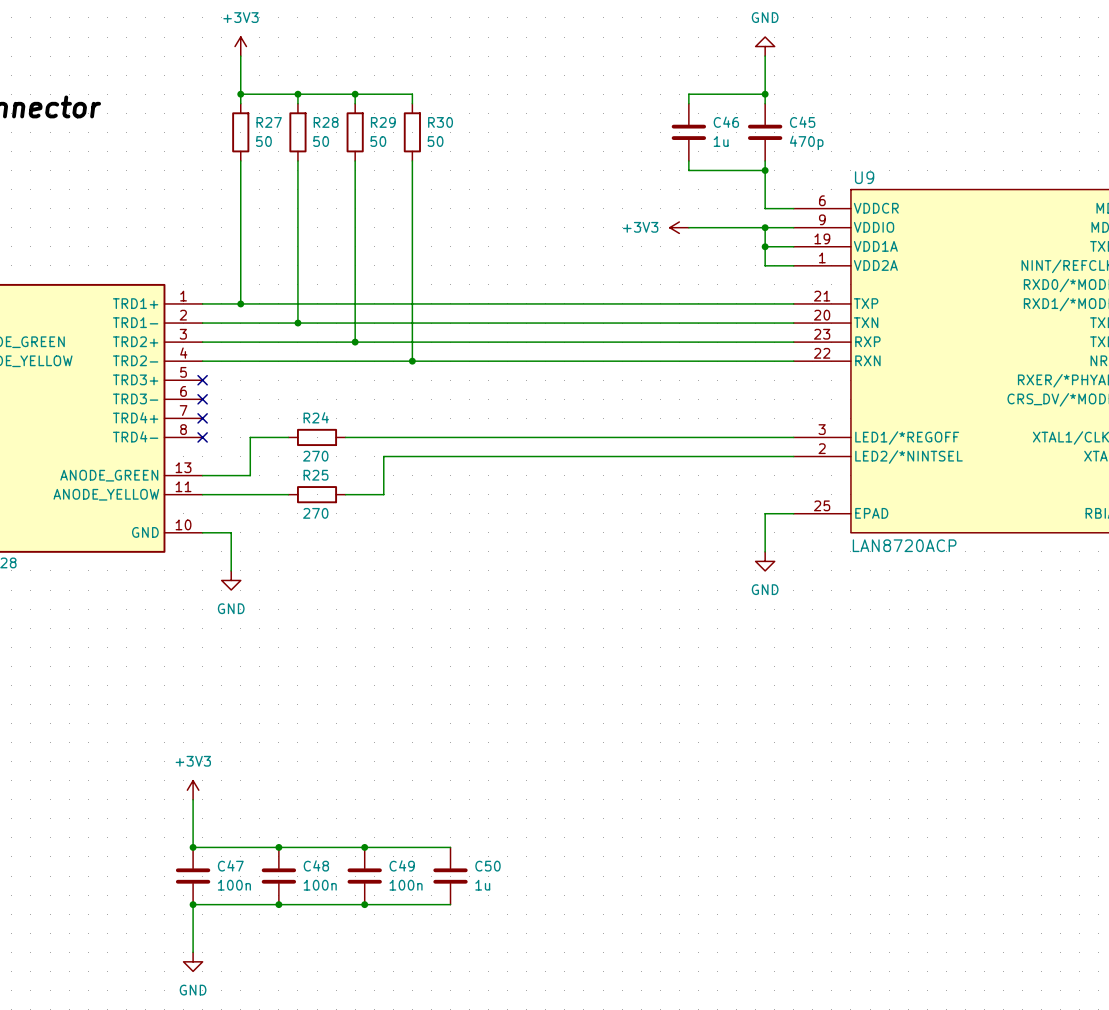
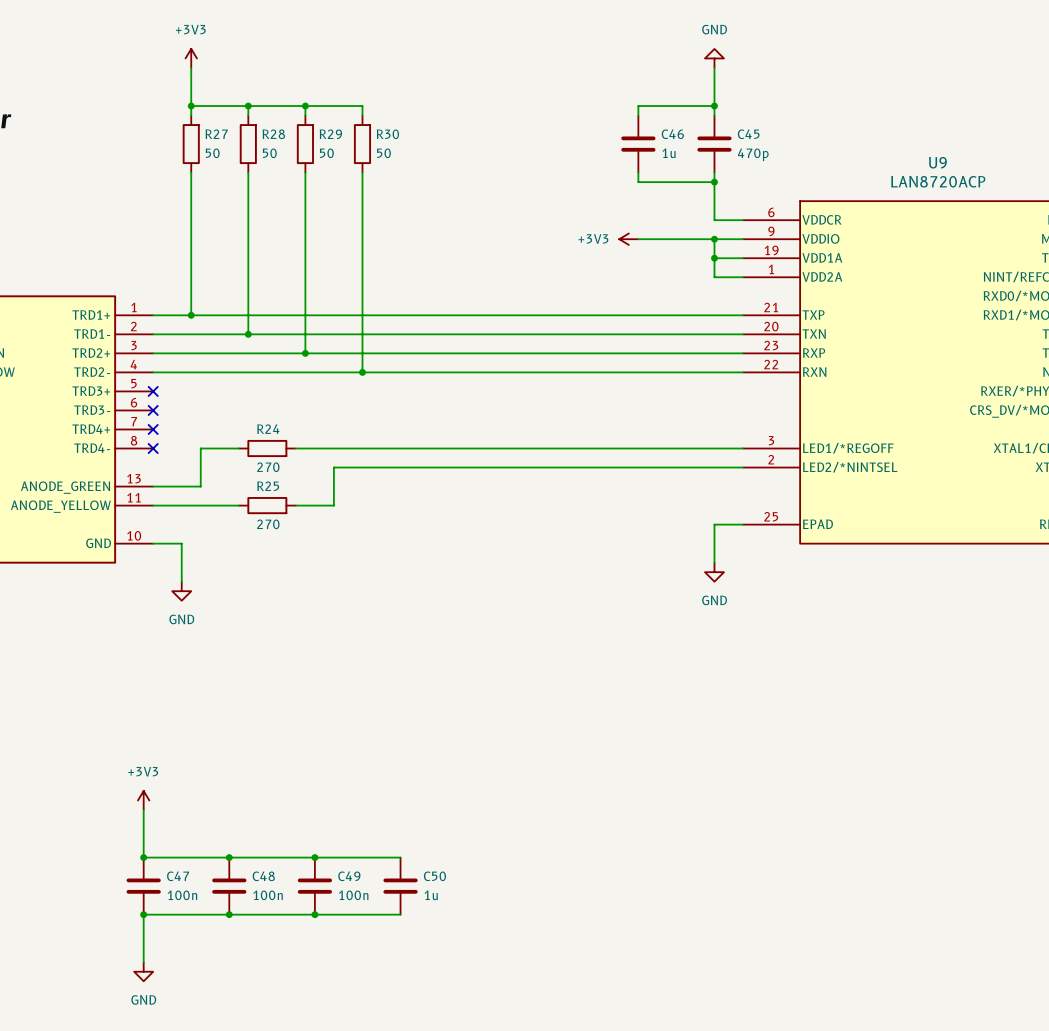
U9 name position: U9 (864, 177) -> U9 (937, 162)
U9 value position: LAN8720ACP (904, 545) -> LAN8720ACP (938, 181)

